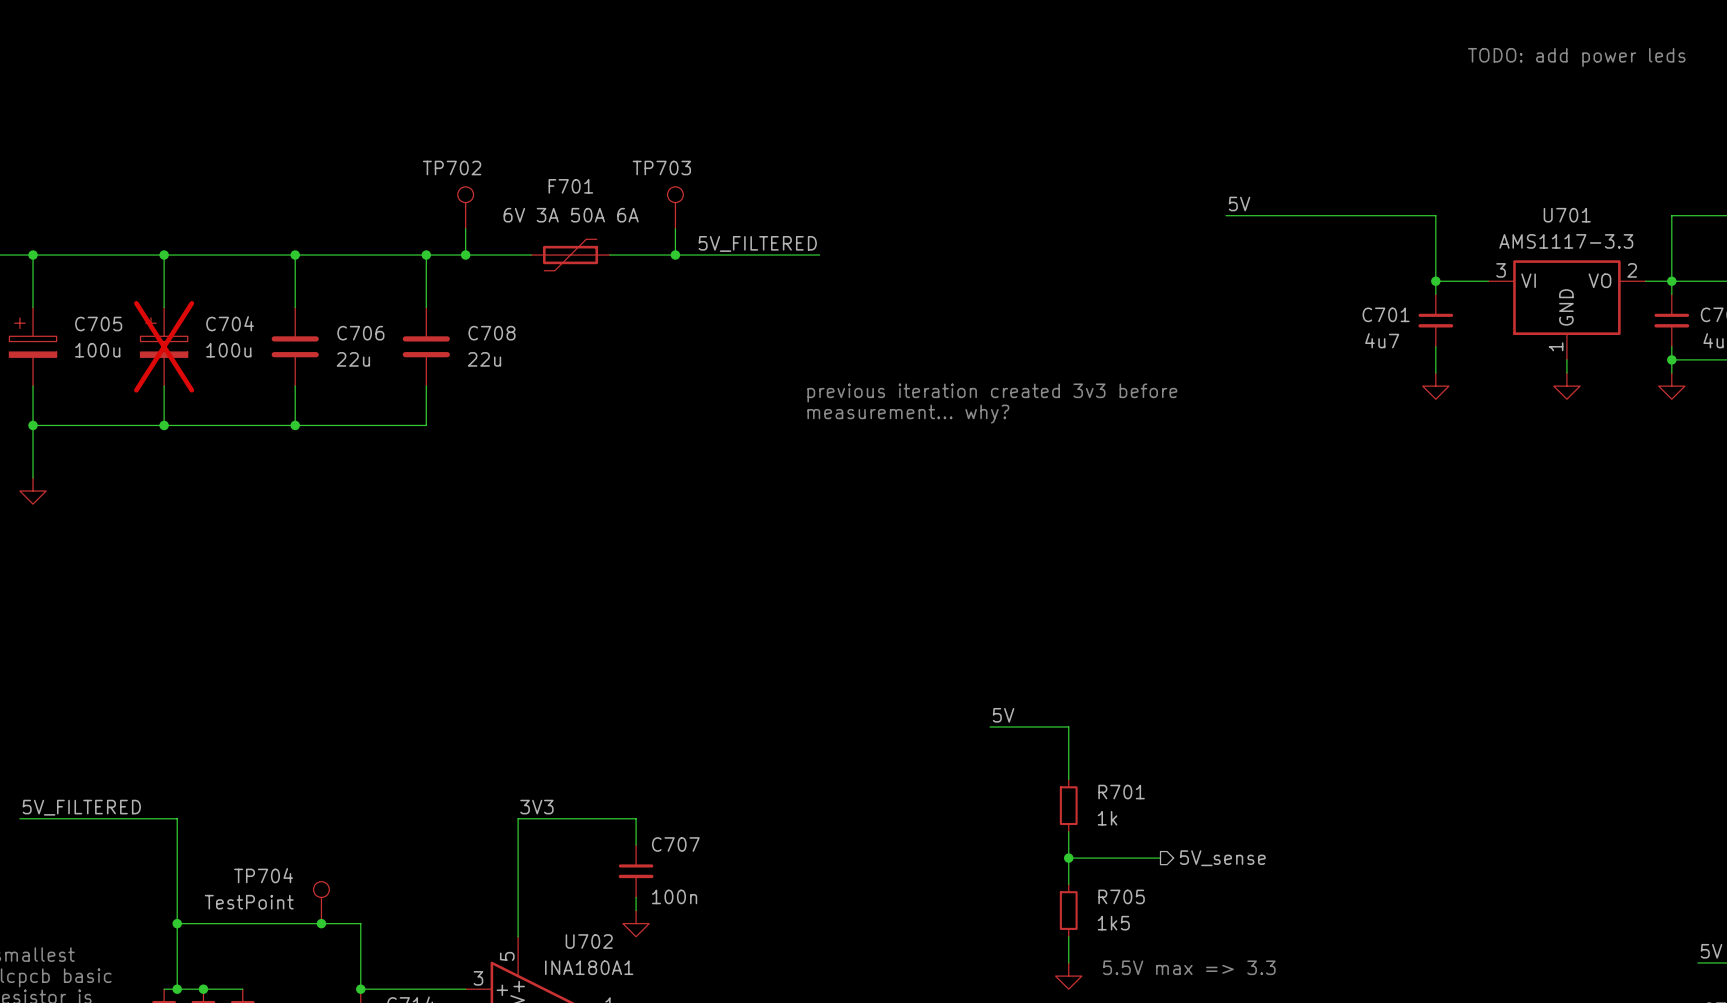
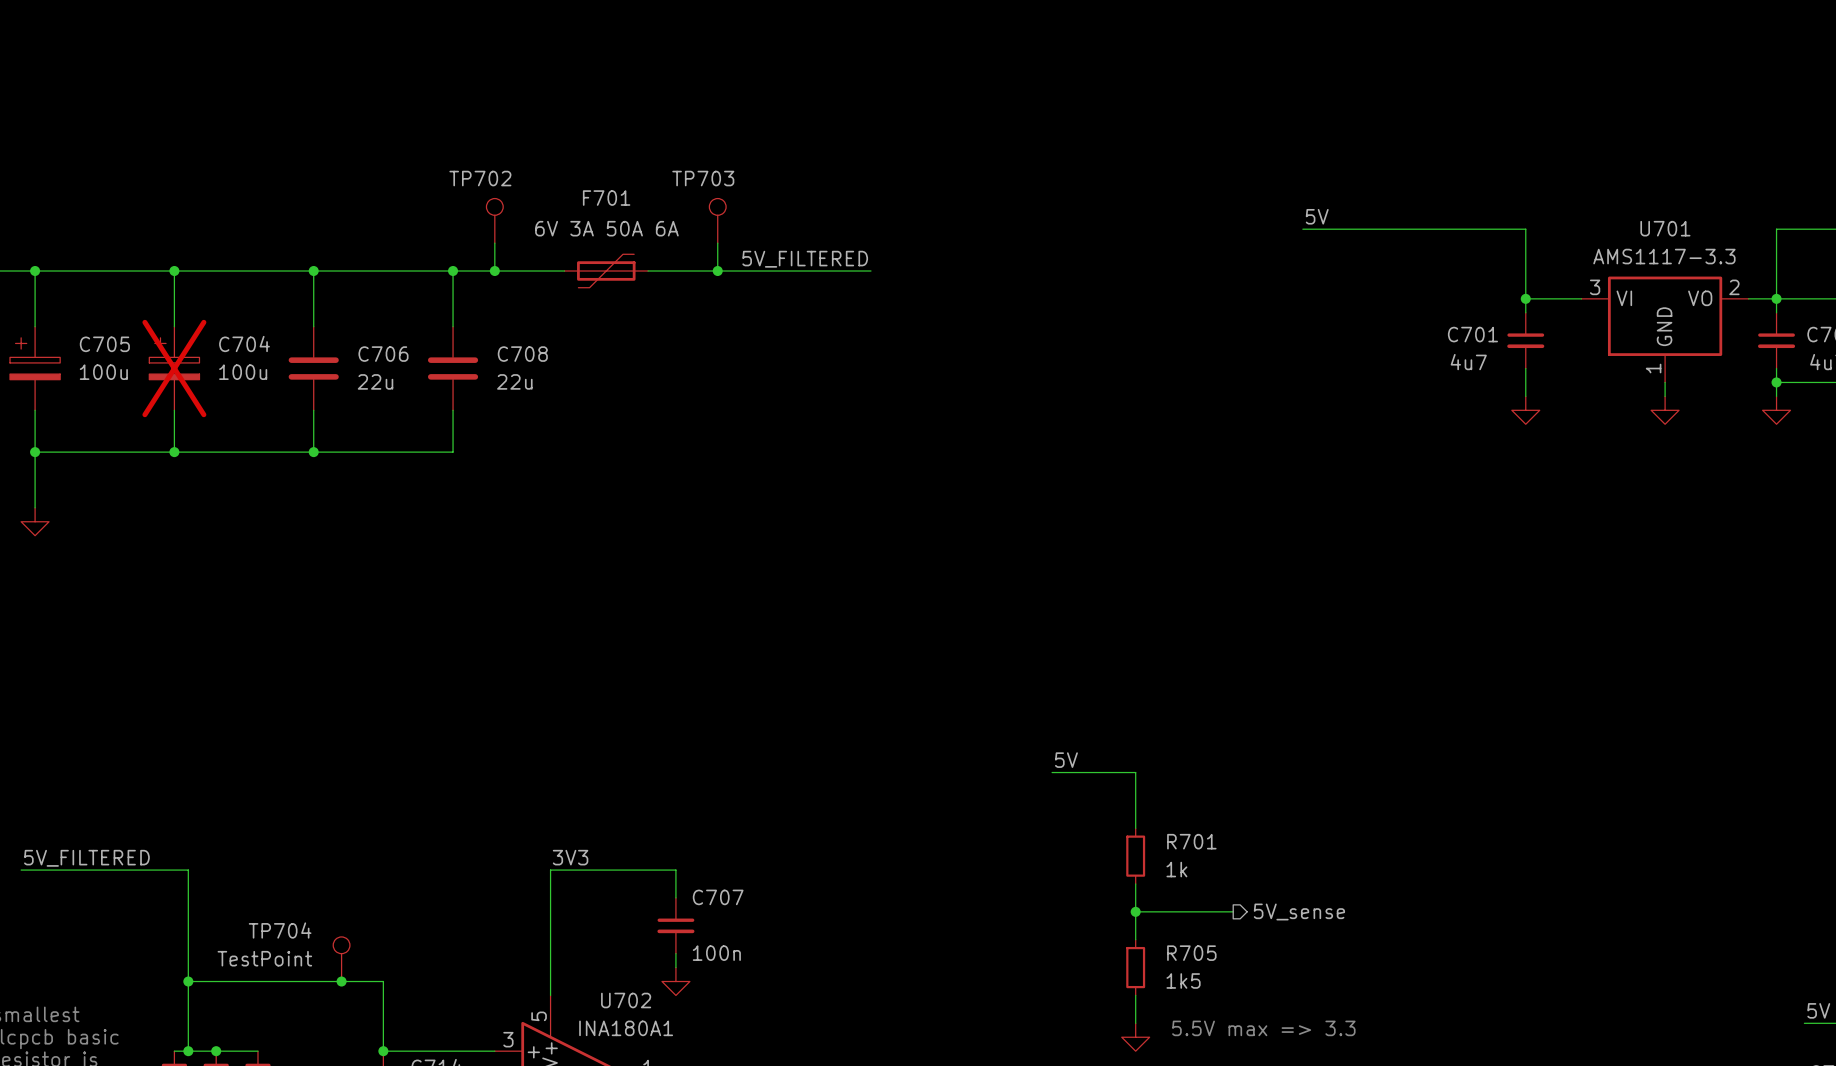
text: TODO: add power leds (1576, 57) -> none
text: previous iteration created 3v3 before (992, 393) -> none
text: measurement… why? (908, 414) -> none

